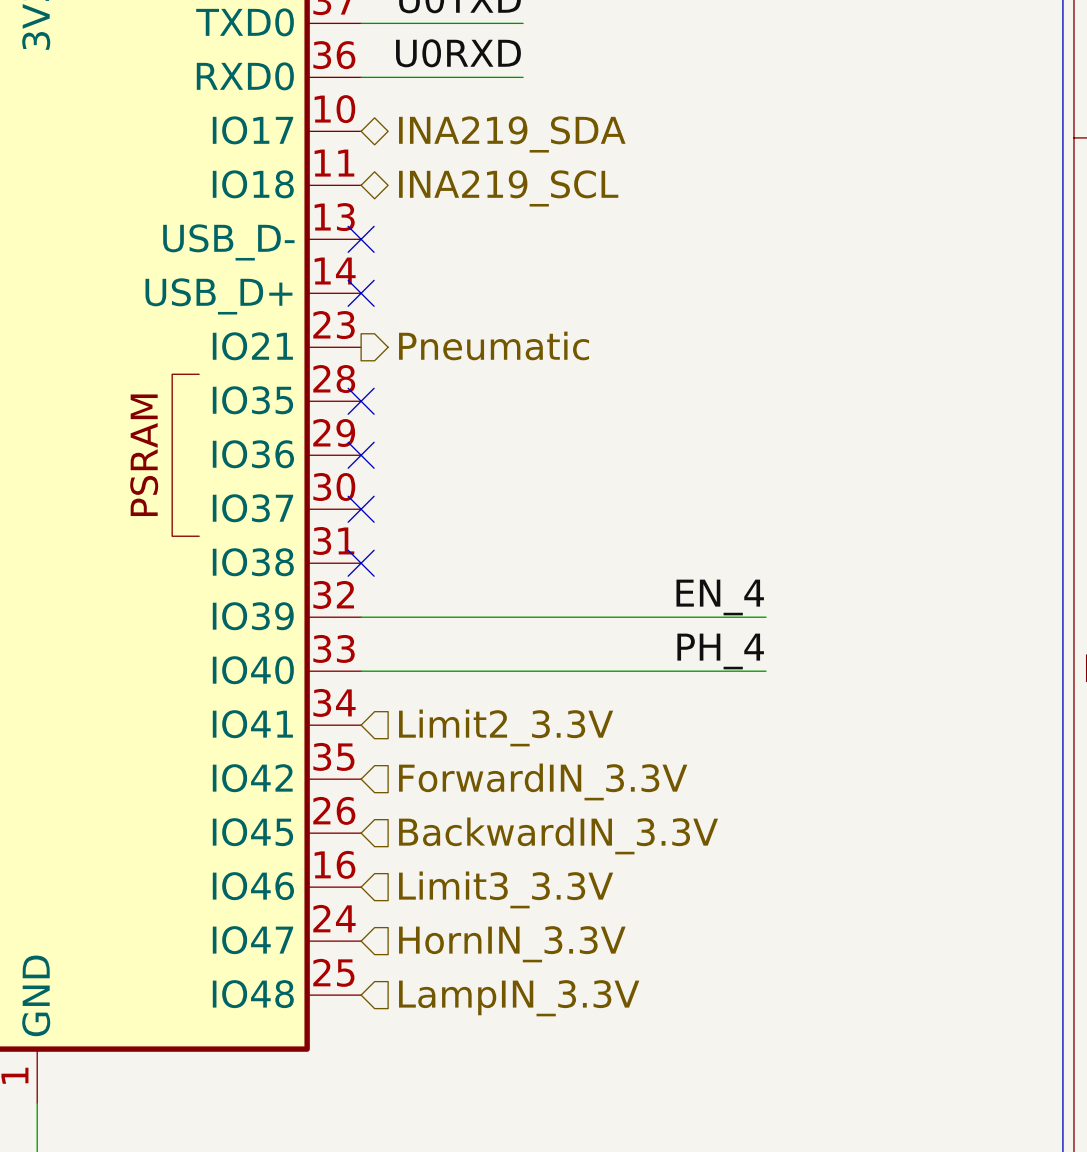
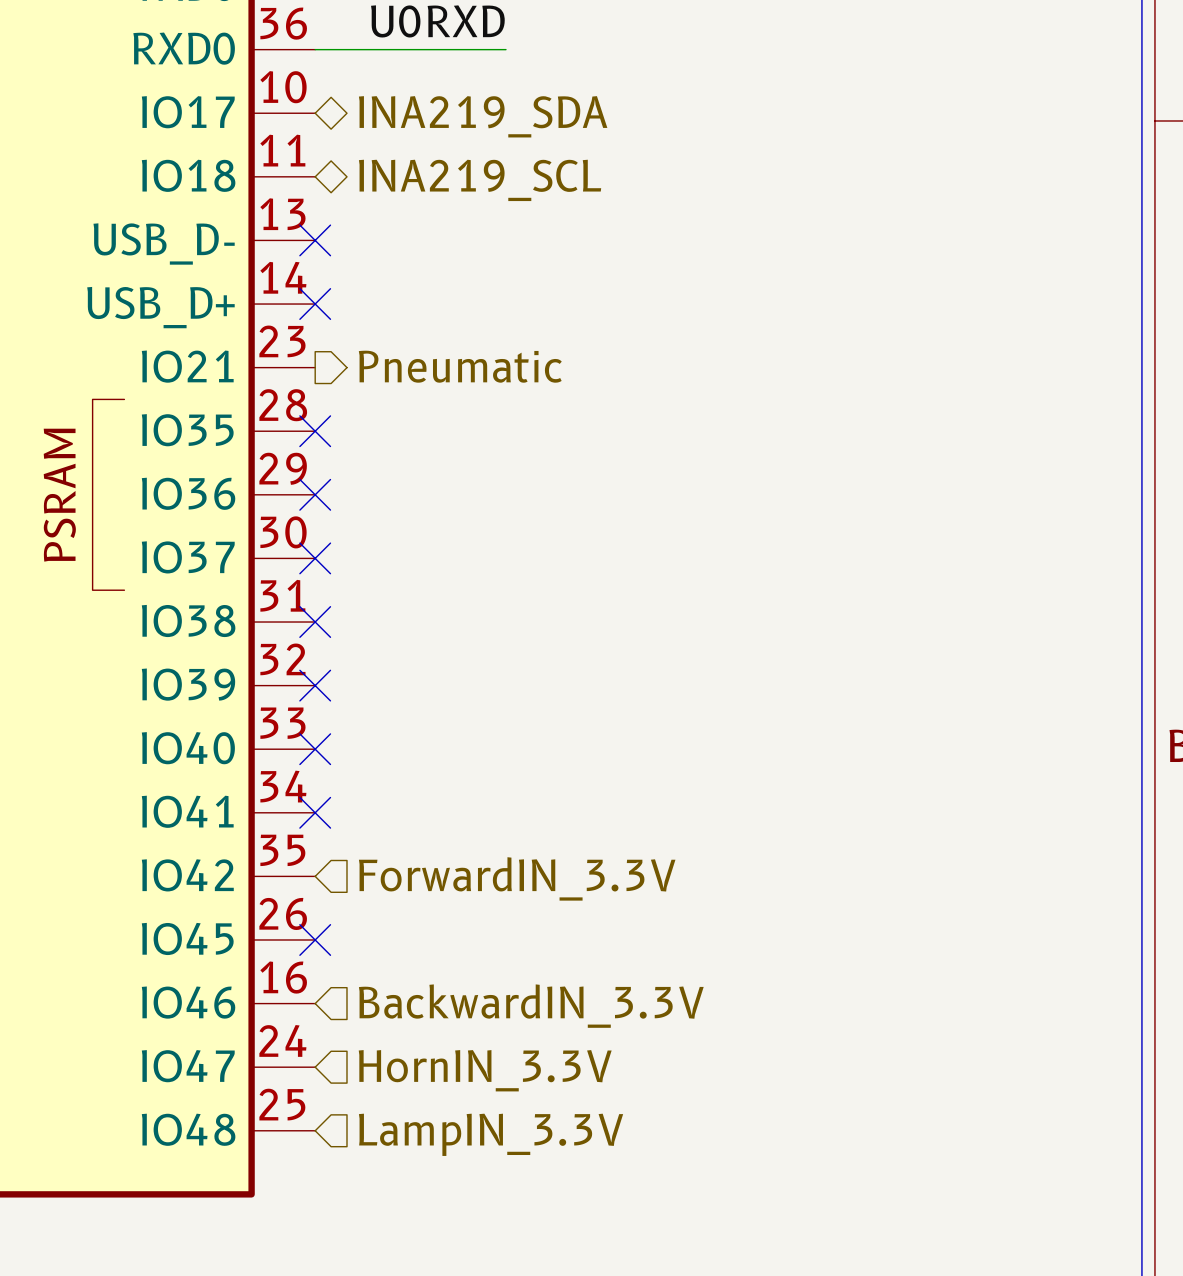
label: EN_4 (720, 597) -> none
wire: (361, 617) (766, 617) -> none
no-connect mark: none -> (315, 685)
label: PH_4 (720, 651) -> none
wire: (361, 671) (766, 671) -> none
no-connect mark: none -> (315, 749)
no-connect mark: none -> (315, 812)
hierarchical label: Limit2_3.3V (506, 727) -> none
no-connect mark: none -> (315, 939)
hierarchical label: BackwardIN_3.3V (558, 835) -> none
hierarchical label: Limit3_3.3V (506, 889) -> BackwardIN_3.3V (531, 1006)

